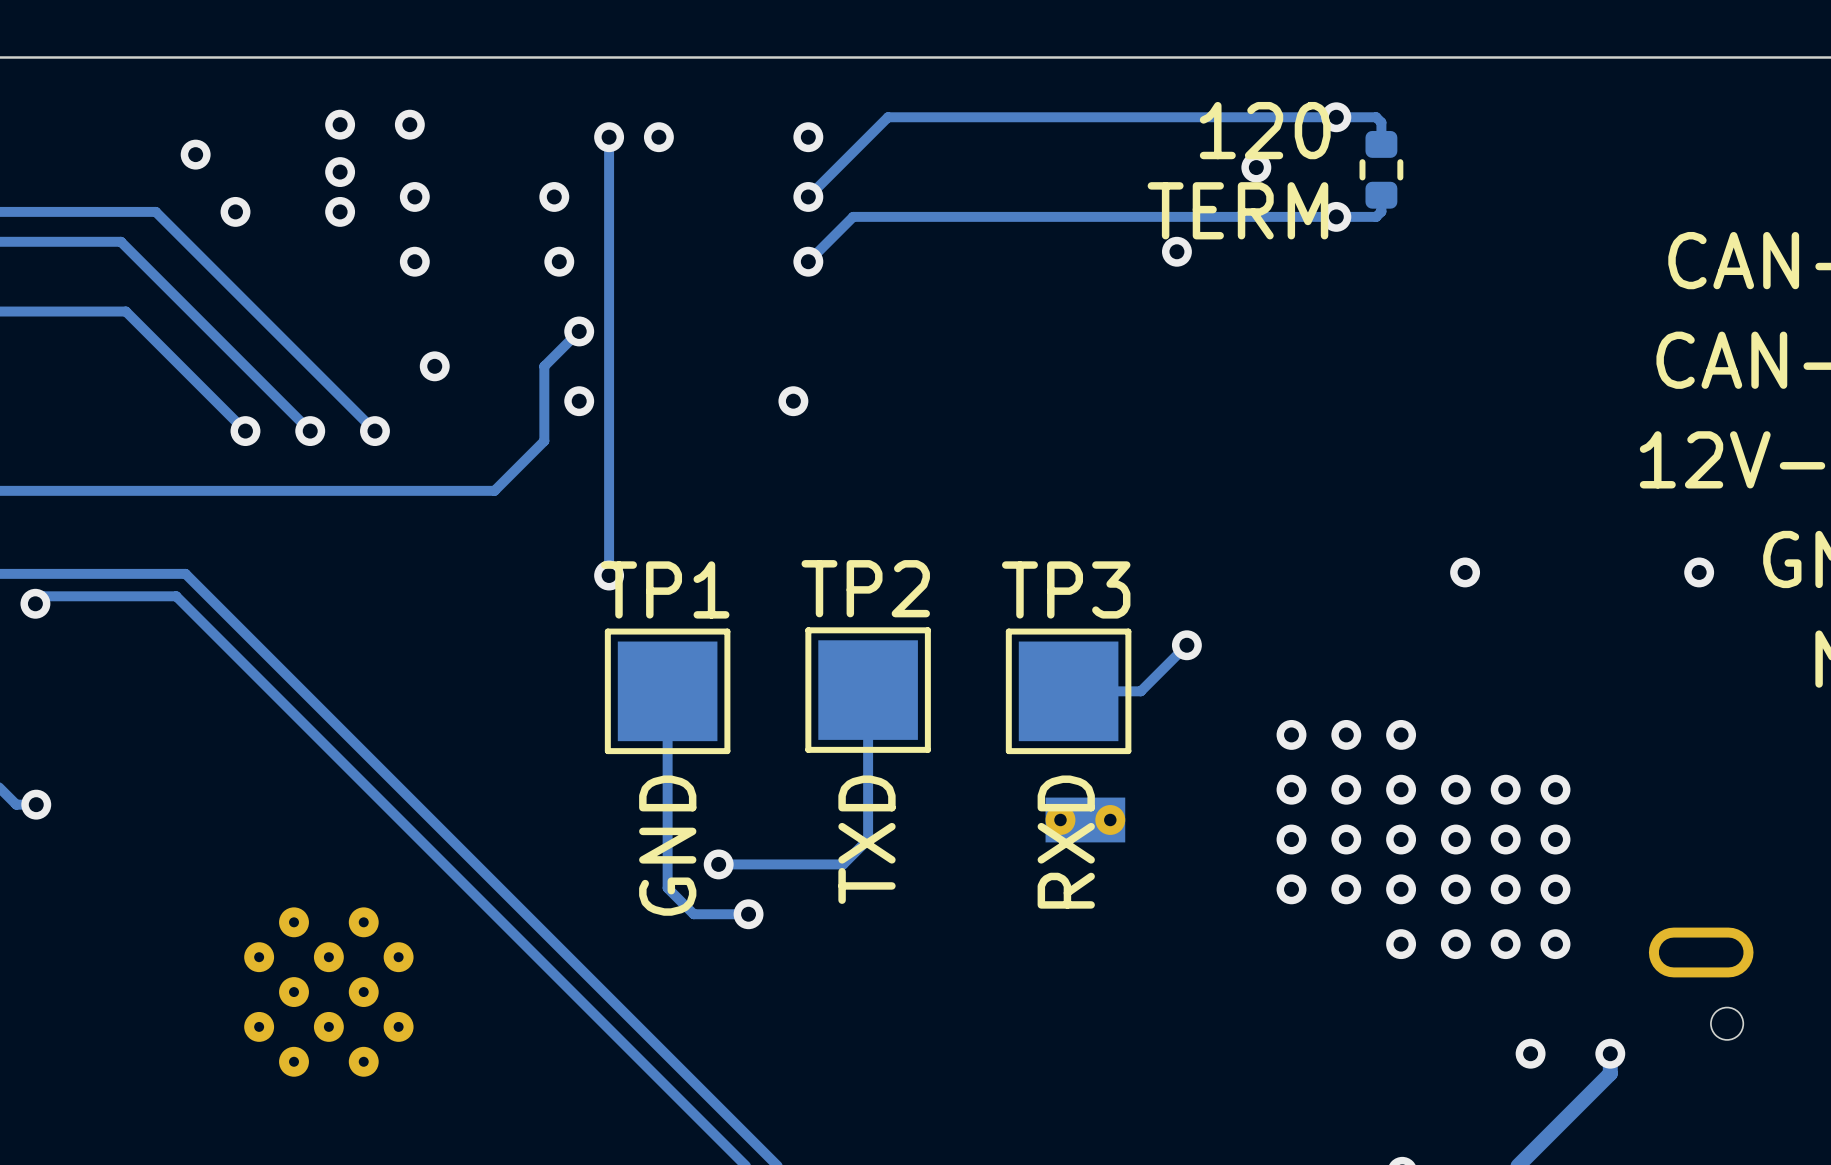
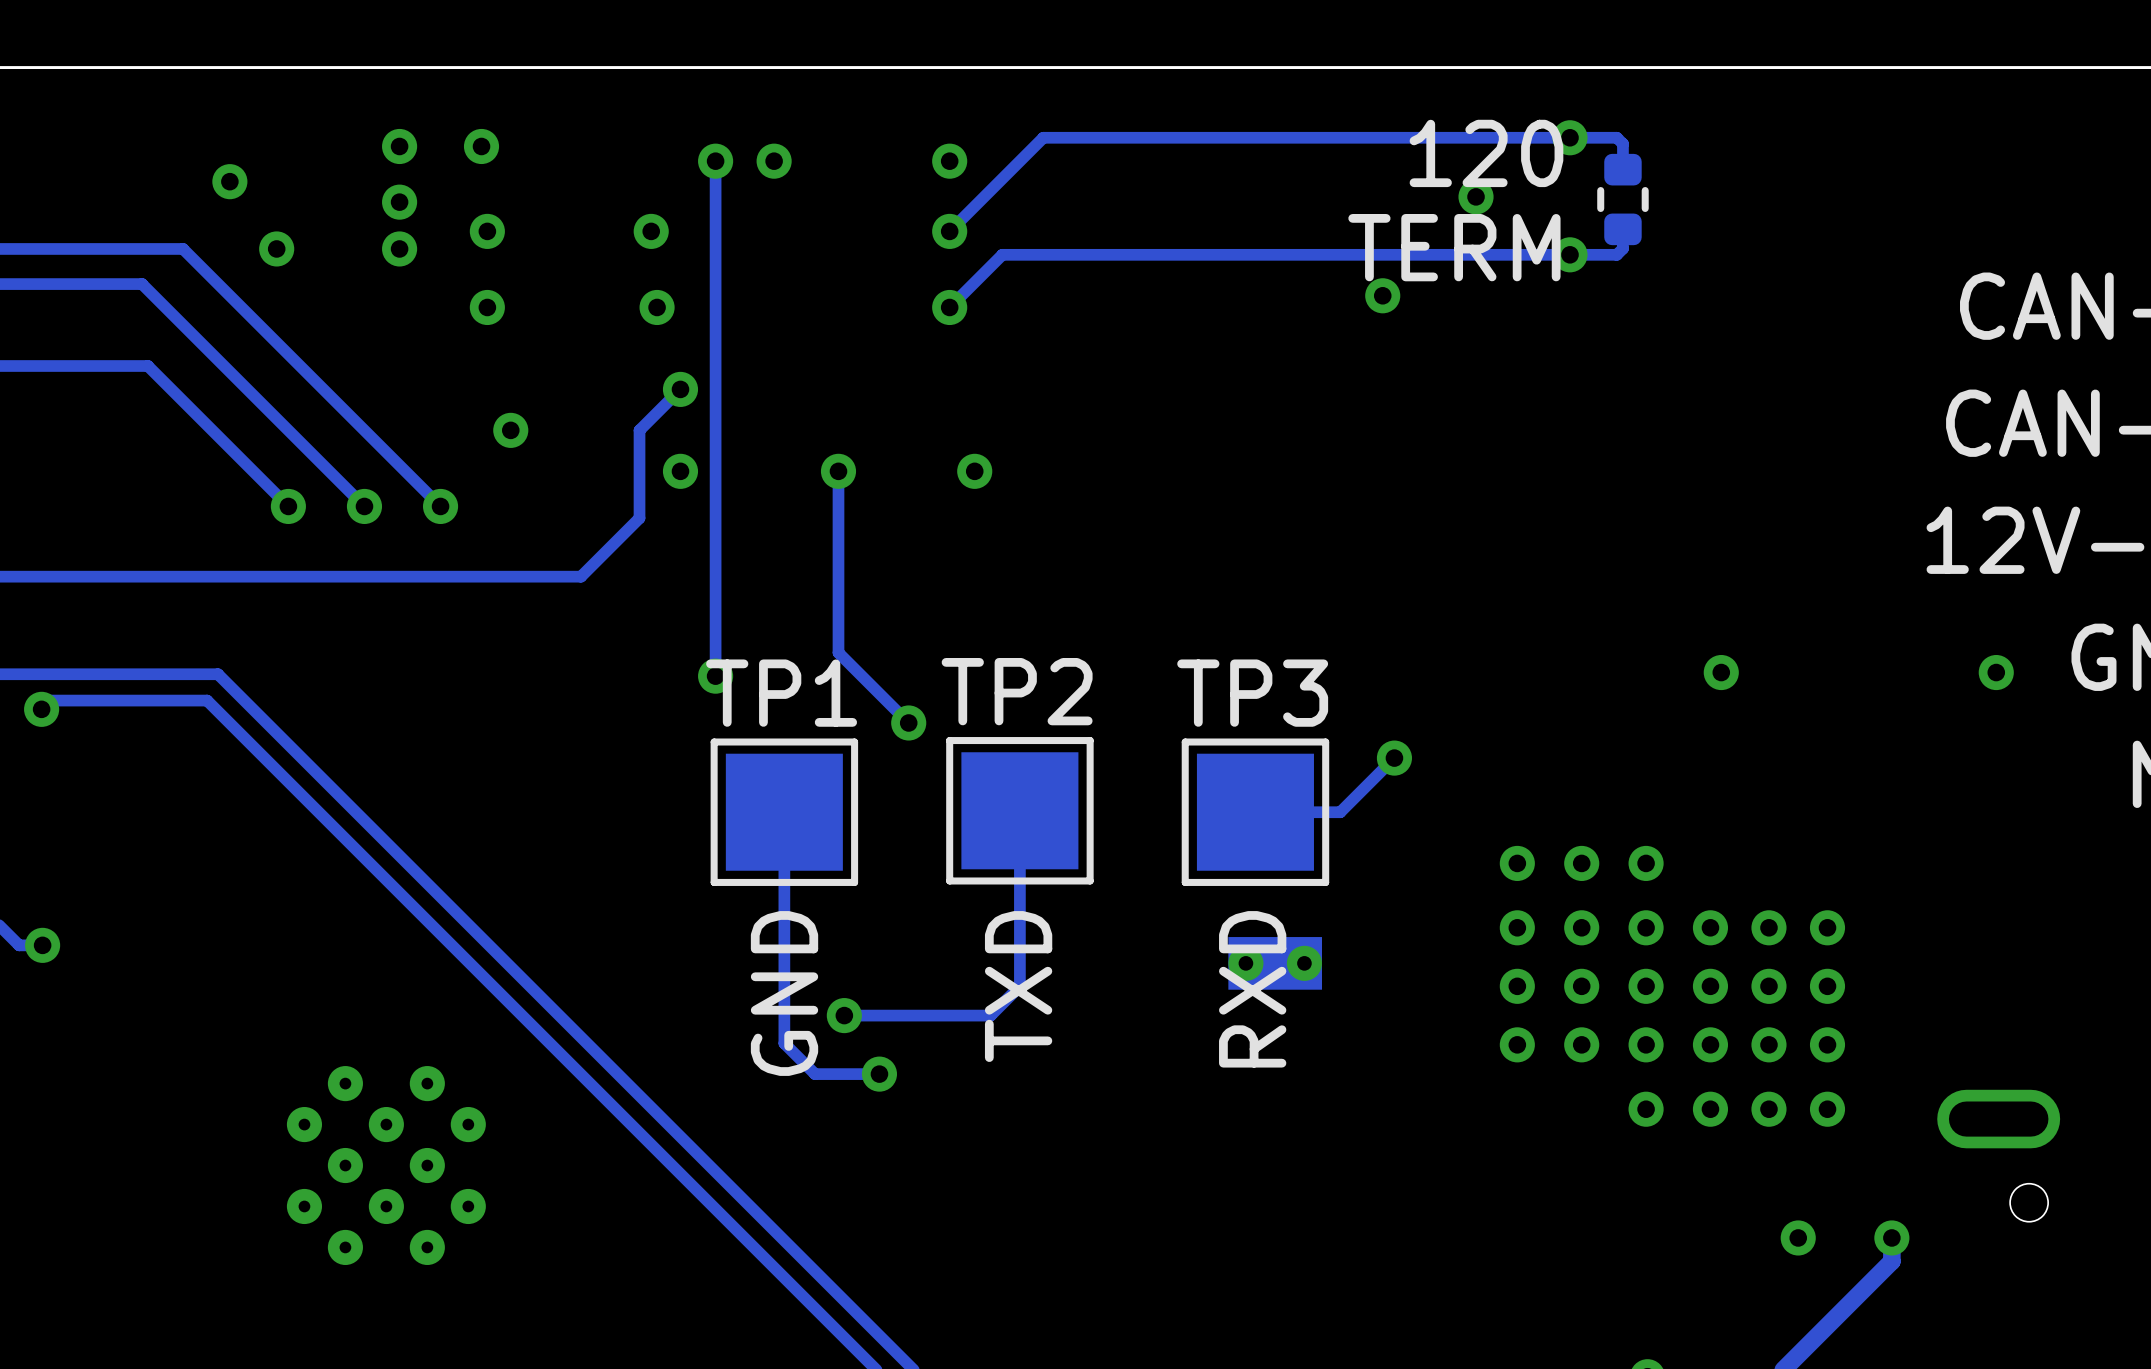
track: none -> (838, 471) (838, 652) (908, 722)
via: none -> (838, 471)
via position: (793, 401) -> (974, 471)
via: none -> (908, 722)

